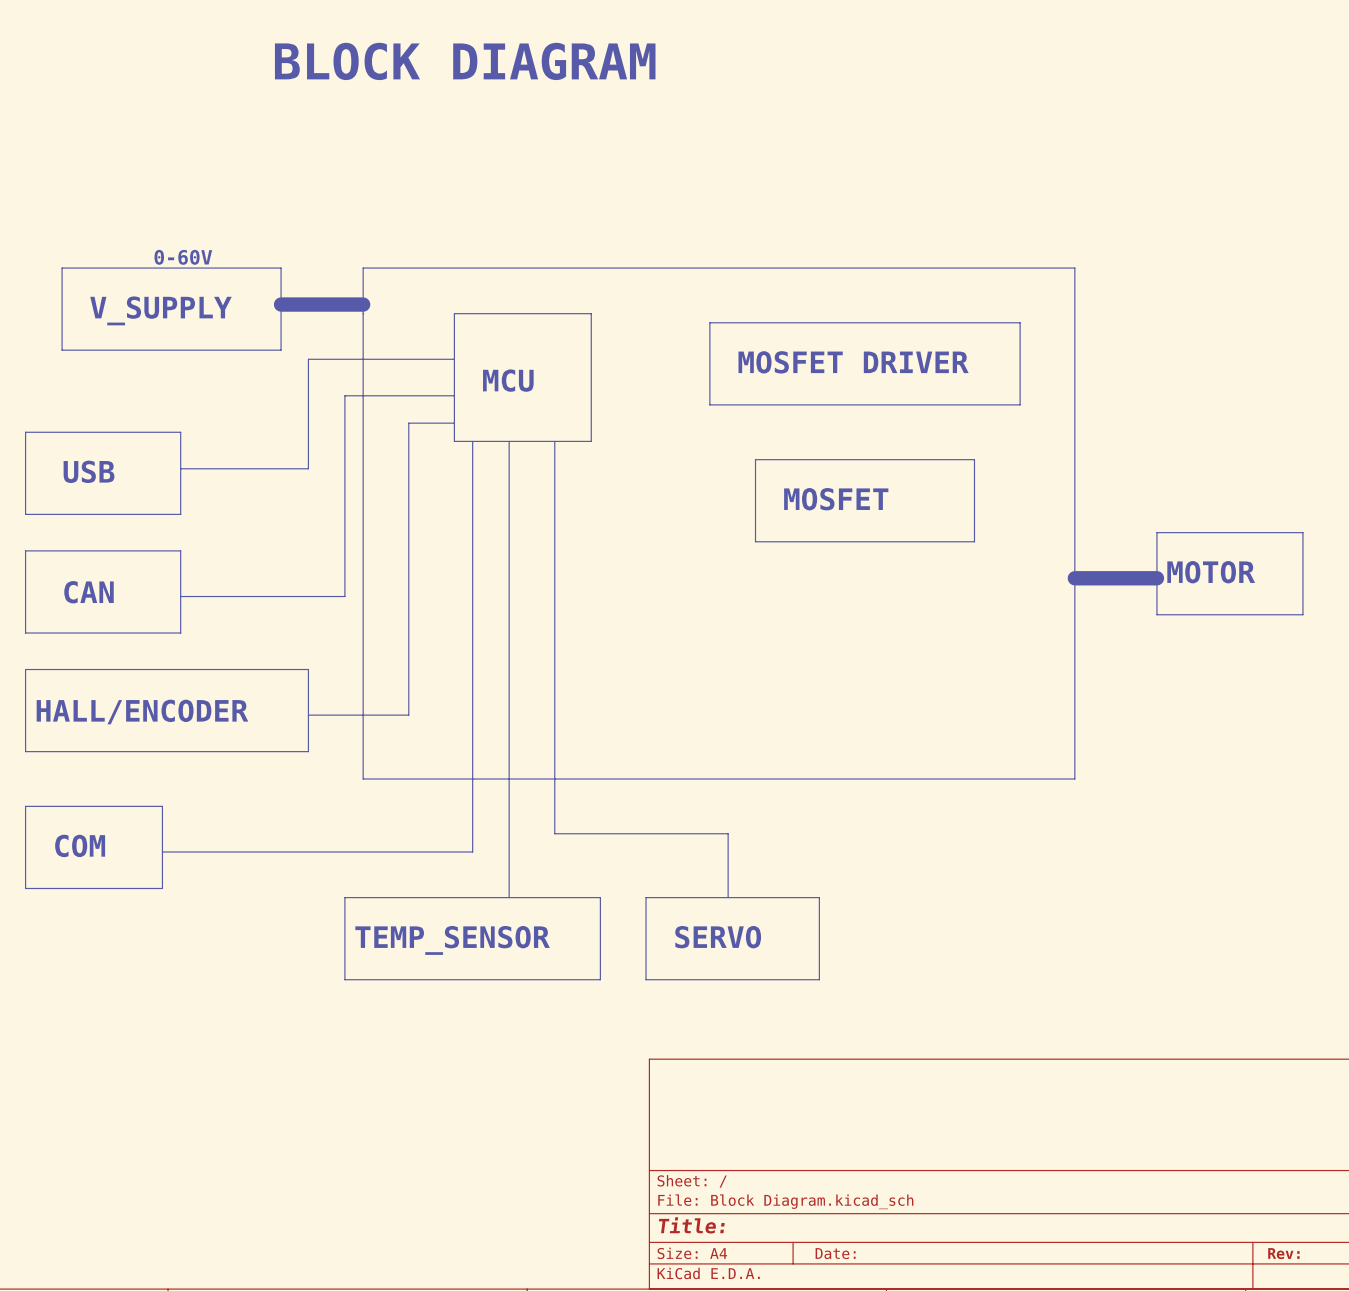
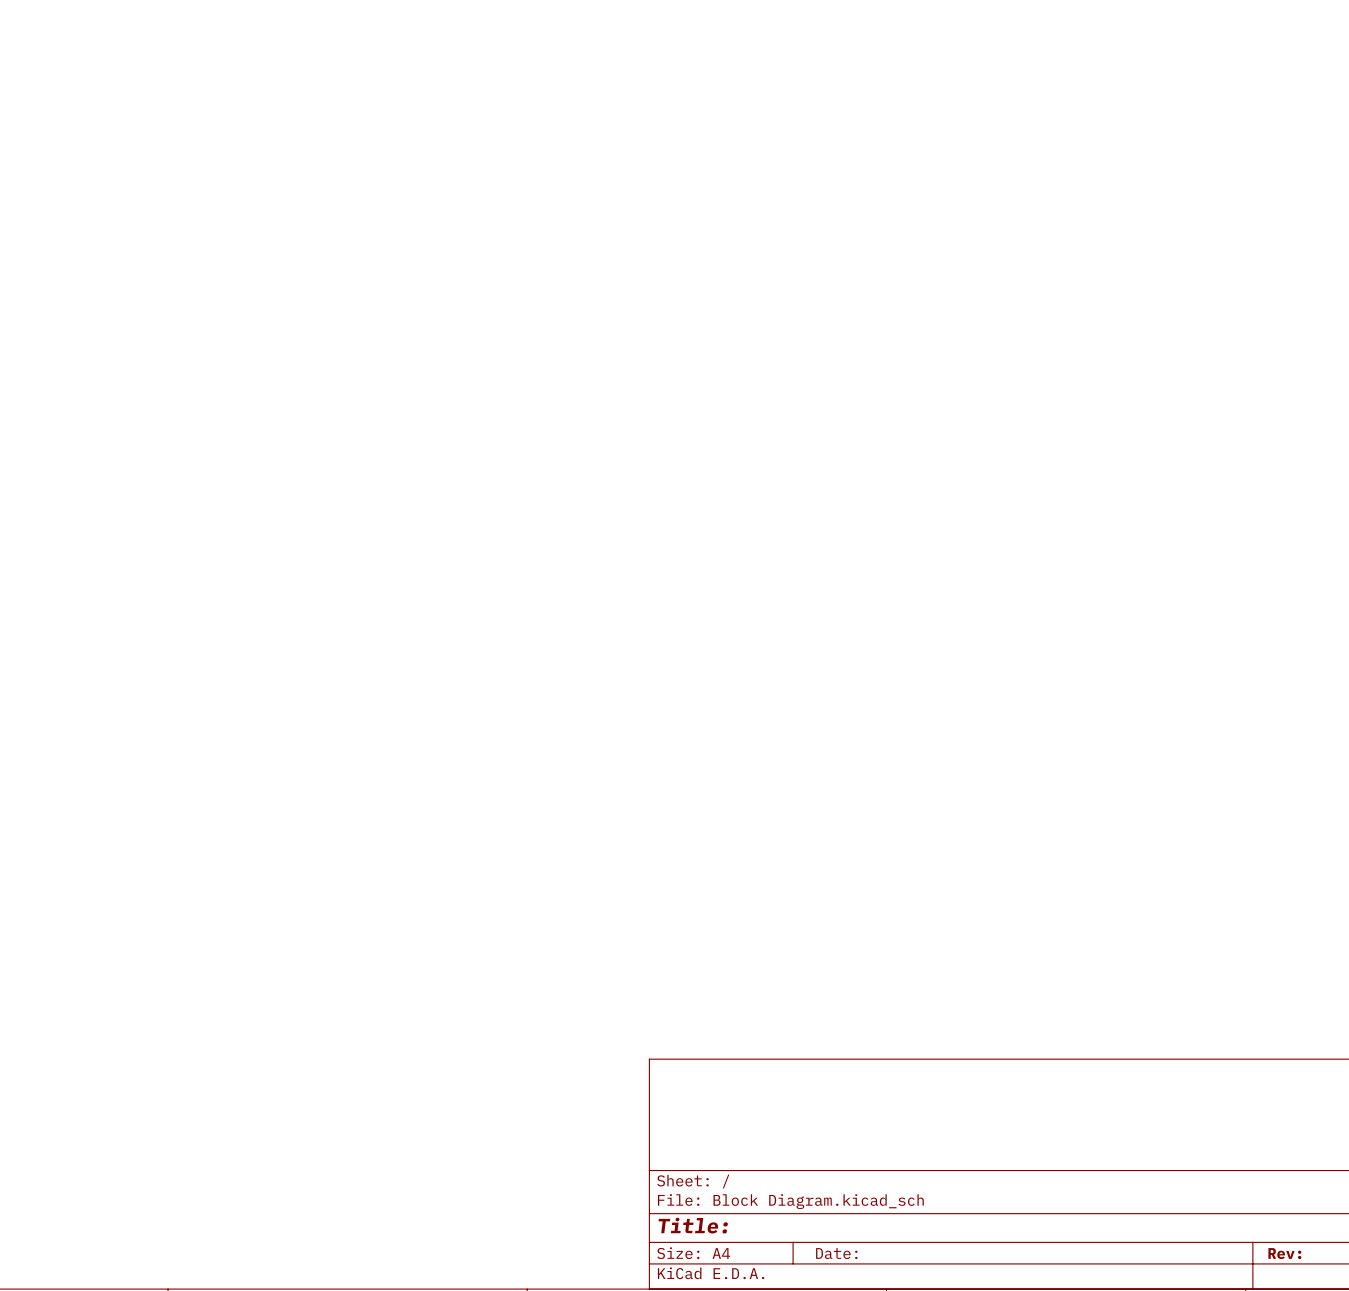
text: BLOCK DIAGRAM (465, 61) -> none
text: 0-60V (183, 257) -> none
line: (62, 268) (281, 268) (281, 350) (62, 350) (62, 268) -> none
line: (363, 268) (1074, 268) (1074, 779) (363, 779) (363, 268) -> none
line: (281, 304) (363, 304) -> none
text: V_SUPPLY (160, 310) -> none
line: (454, 313) (591, 313) (591, 441) (454, 441) (454, 313) -> none
line: (709, 322) (1020, 322) (1020, 404) (709, 404) (709, 322) -> none
line: (454, 359) (308, 359) (308, 468) (180, 468) -> none
text: MOSFET DRIVER (853, 362) -> none
text: MCU (508, 380) -> none
line: (454, 395) (344, 395) (344, 596) (180, 596) -> none
line: (454, 423) (408, 423) (408, 715) (308, 715) -> none
line: (25, 432) (25, 514) (180, 514) (180, 432) (25, 432) -> none
line: (472, 441) (472, 851) (162, 851) -> none
line: (509, 441) (509, 897) -> none
line: (554, 441) (554, 833) (728, 833) (728, 897) -> none
line: (755, 459) (755, 541) (974, 541) (974, 459) (755, 459) -> none
text: USB (89, 471) -> none
text: MOSFET (836, 499) -> none
line: (1156, 532) (1302, 532) (1302, 614) (1156, 614) (1156, 532) -> none
line: (25, 550) (25, 633) (180, 633) (180, 550) (25, 550) -> none
text: MOTOR (1211, 572) -> none
line: (1074, 578) (1156, 578) -> none
text: CAN (88, 592) -> none
line: (25, 669) (25, 751) (308, 751) (308, 669) (25, 669) -> none
text: HALL/ENCODER (142, 712) -> none
line: (25, 806) (25, 888) (162, 888) (162, 806) (25, 806) -> none
text: COM (80, 845) -> none
line: (344, 897) (344, 979) (600, 979) (600, 897) (344, 897) -> none
line: (646, 897) (646, 979) (819, 979) (819, 897) (646, 897) -> none
text: SERVO (718, 937) -> none
text: TEMP_SENSOR (452, 940) -> none

